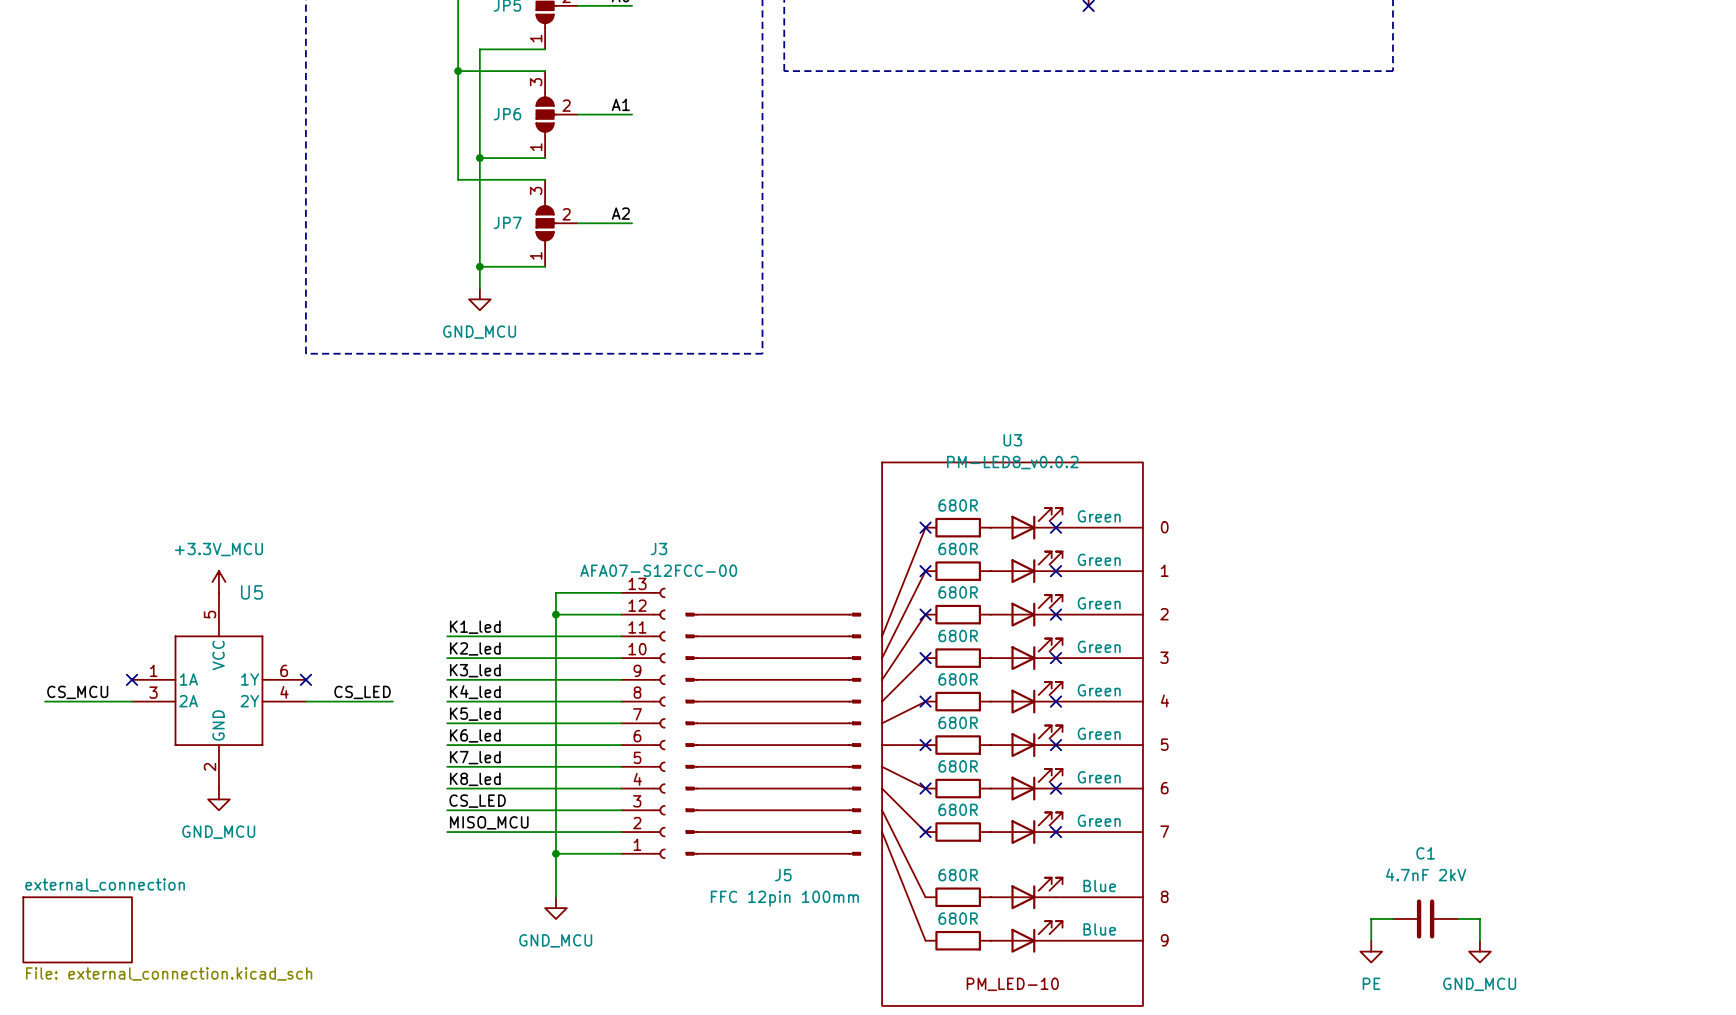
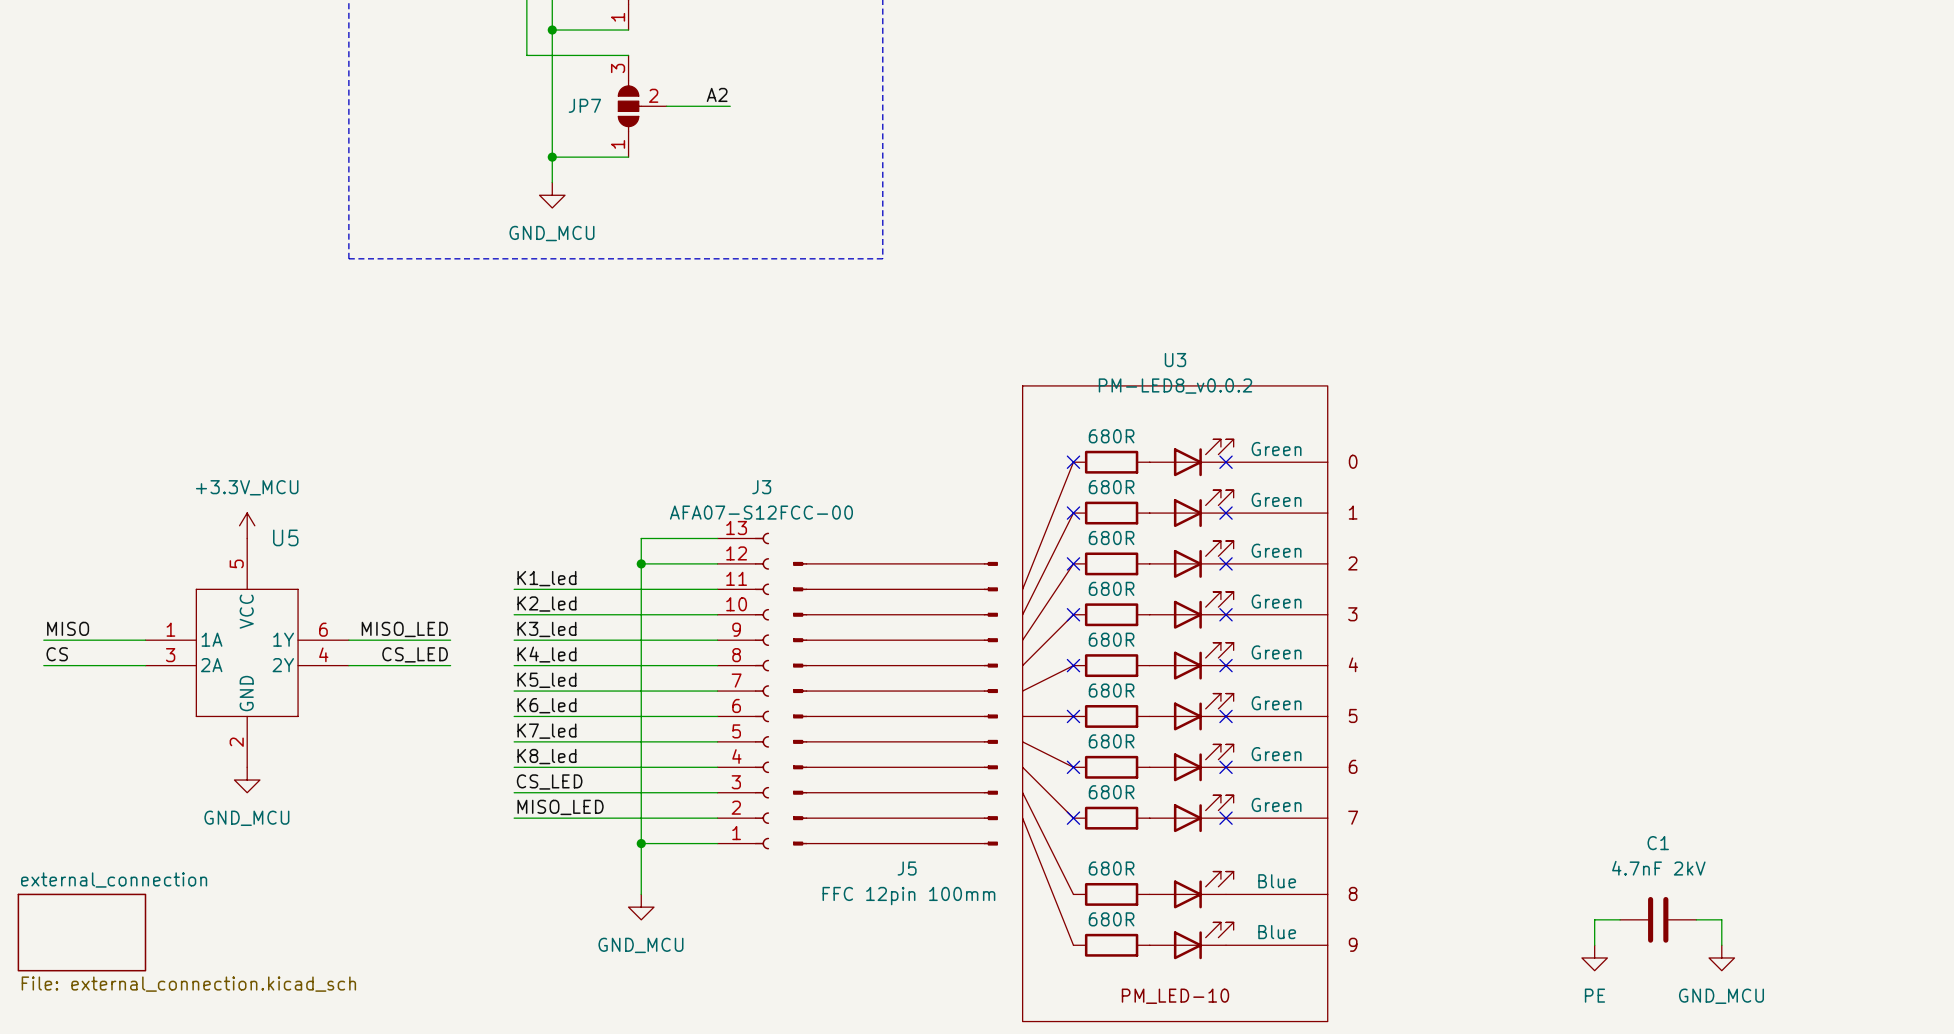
label: none -> MISO (68, 628)
label: none -> MISO_LED (404, 629)
wire: none -> (43, 640) (145, 640)
no-connect mark: (132, 679) -> none
wire: none -> (348, 640) (450, 640)
no-connect mark: (305, 679) -> none
label: CS_MCU (77, 692) -> CS (57, 654)
label: MISO_MCU (489, 822) -> MISO_LED (560, 807)

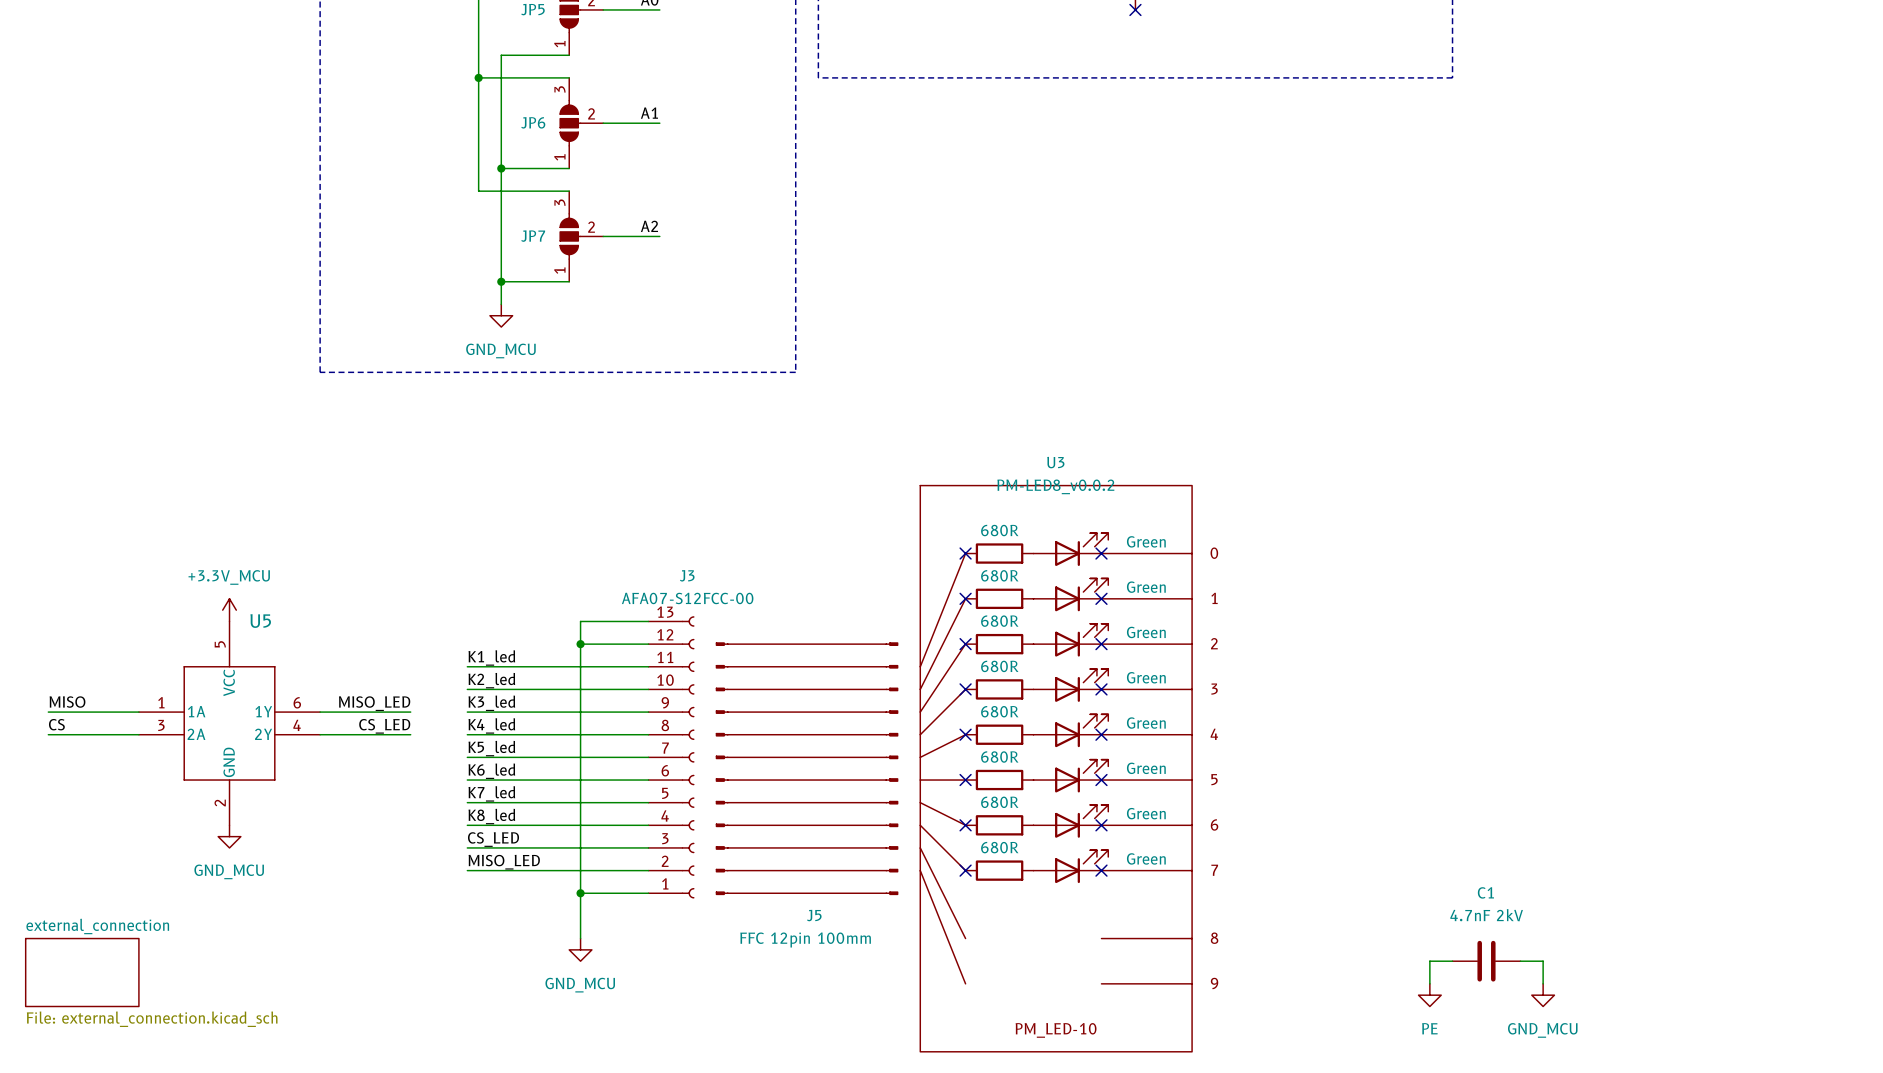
part: (1191, 889) -> none
part: 680R (1111, 894) -> none
part: (1191, 940) -> none
part: 680R (1111, 945) -> none

